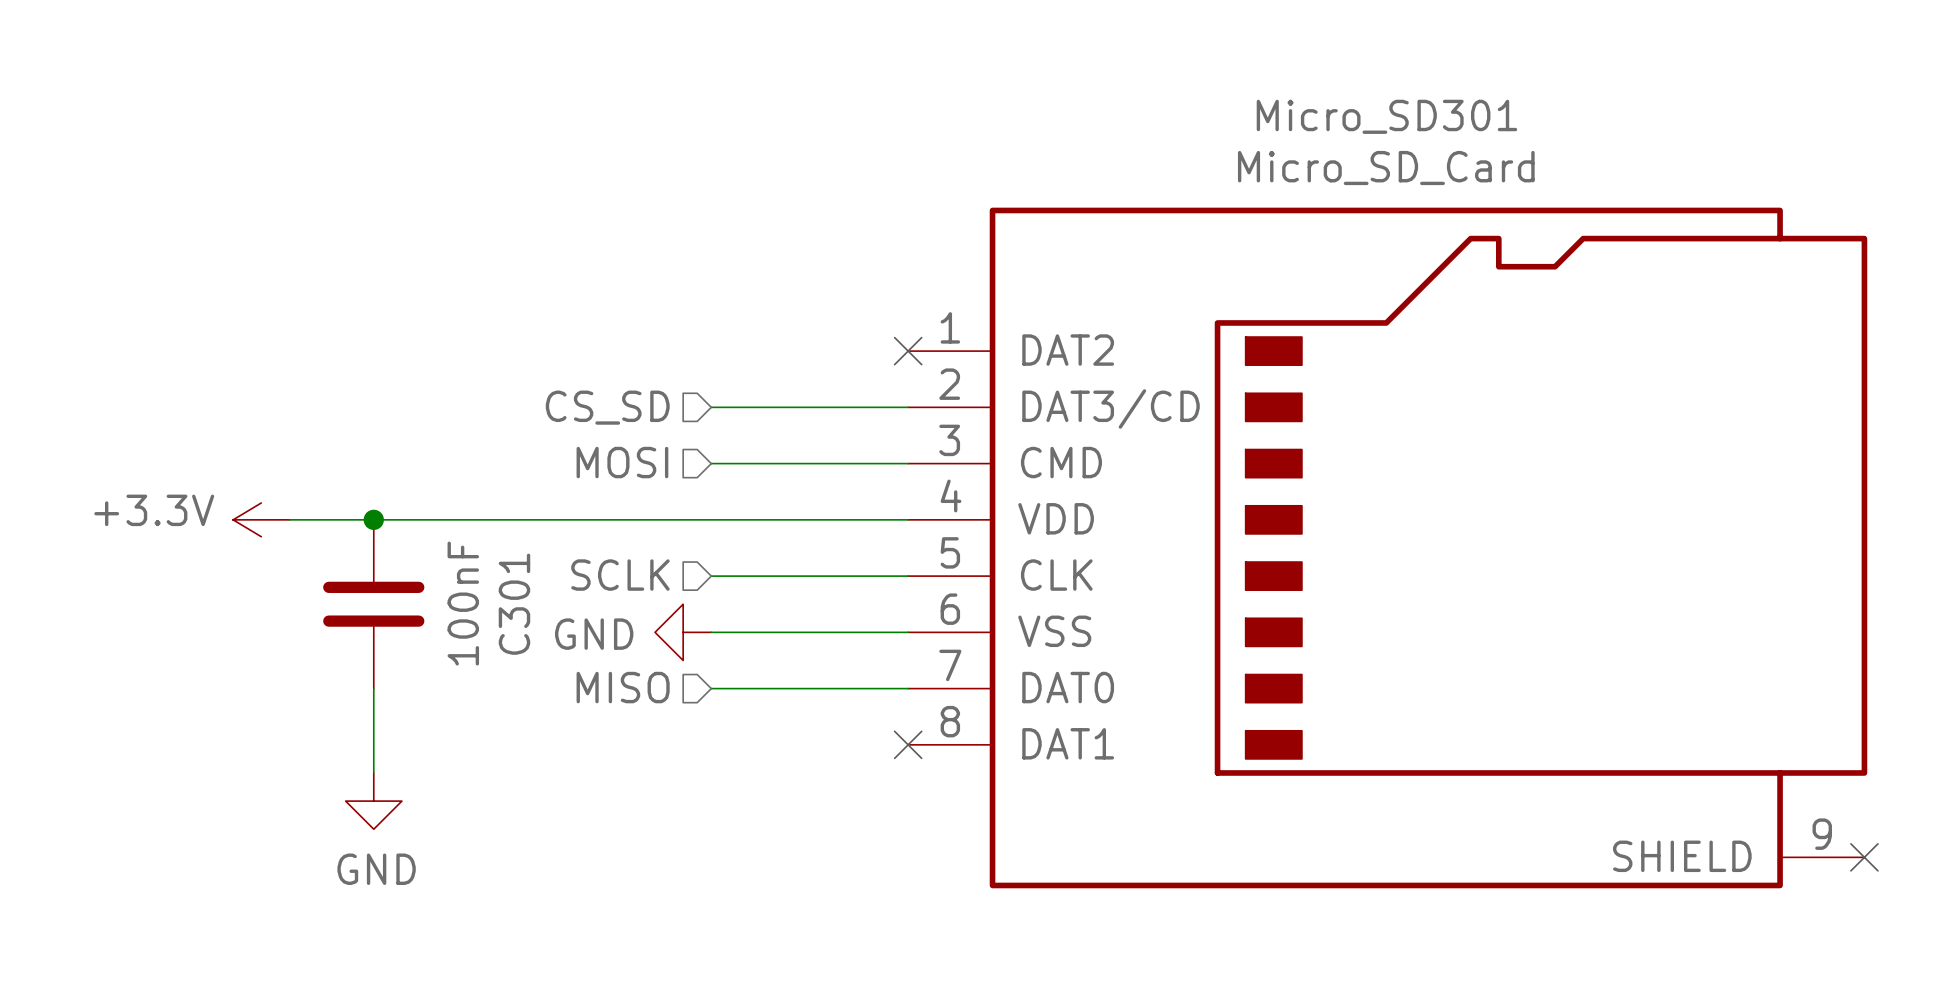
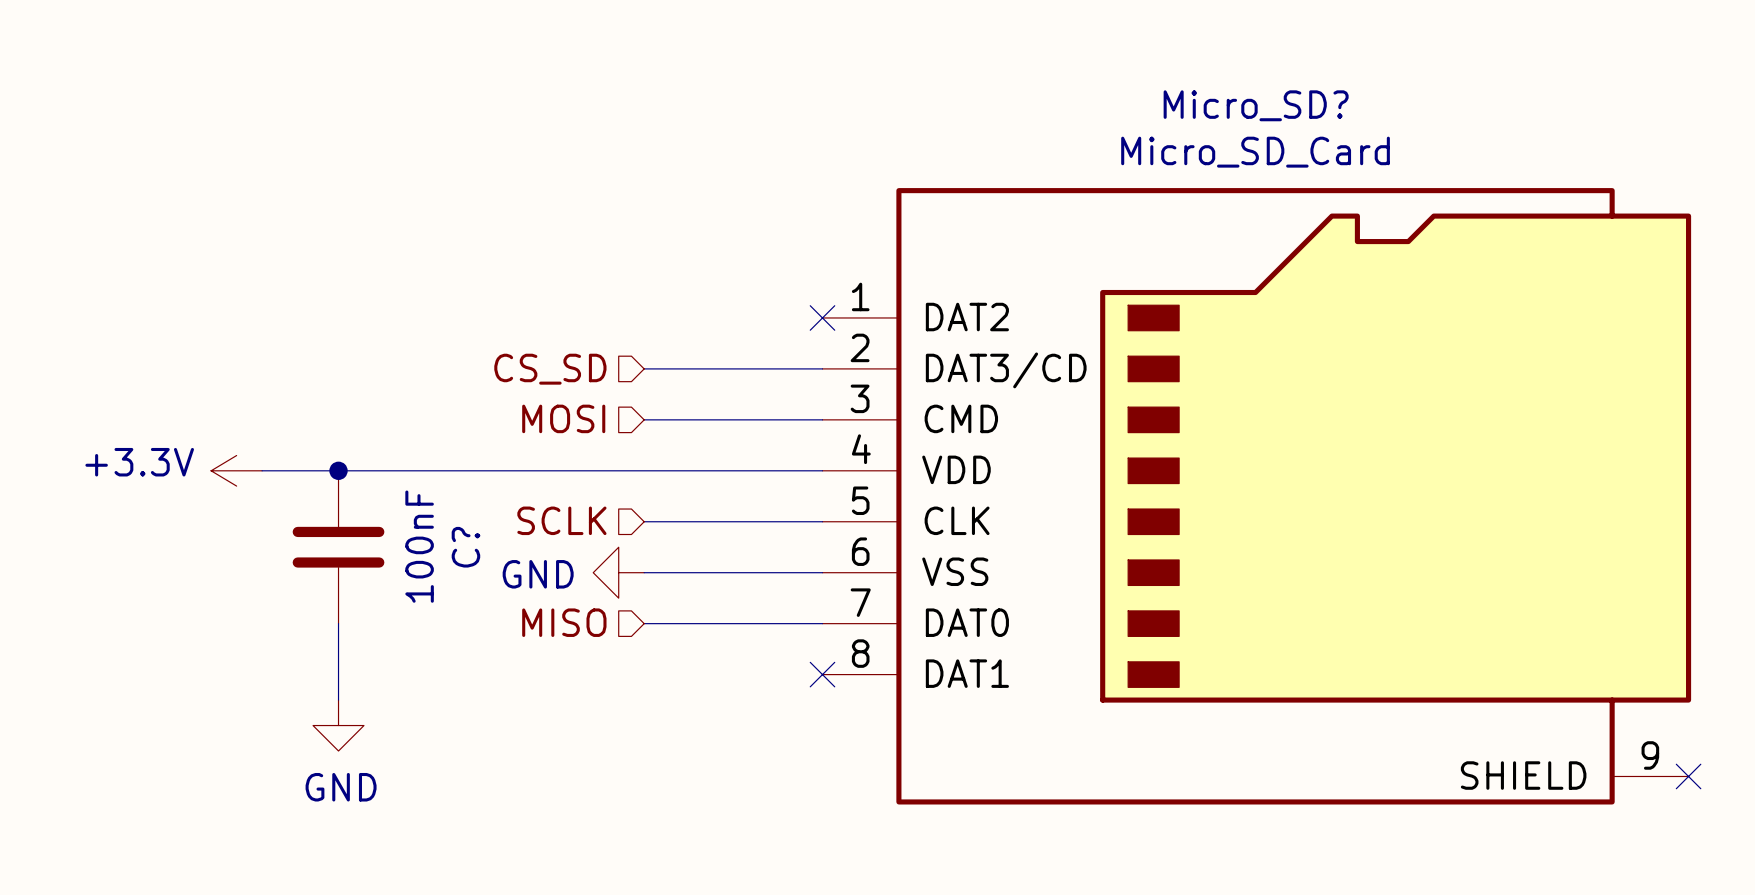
Micro_SD301 name: Micro_SD301 (1386, 116) -> Micro_SD? (1256, 105)
C301 name: C301 (514, 604) -> C? (465, 547)

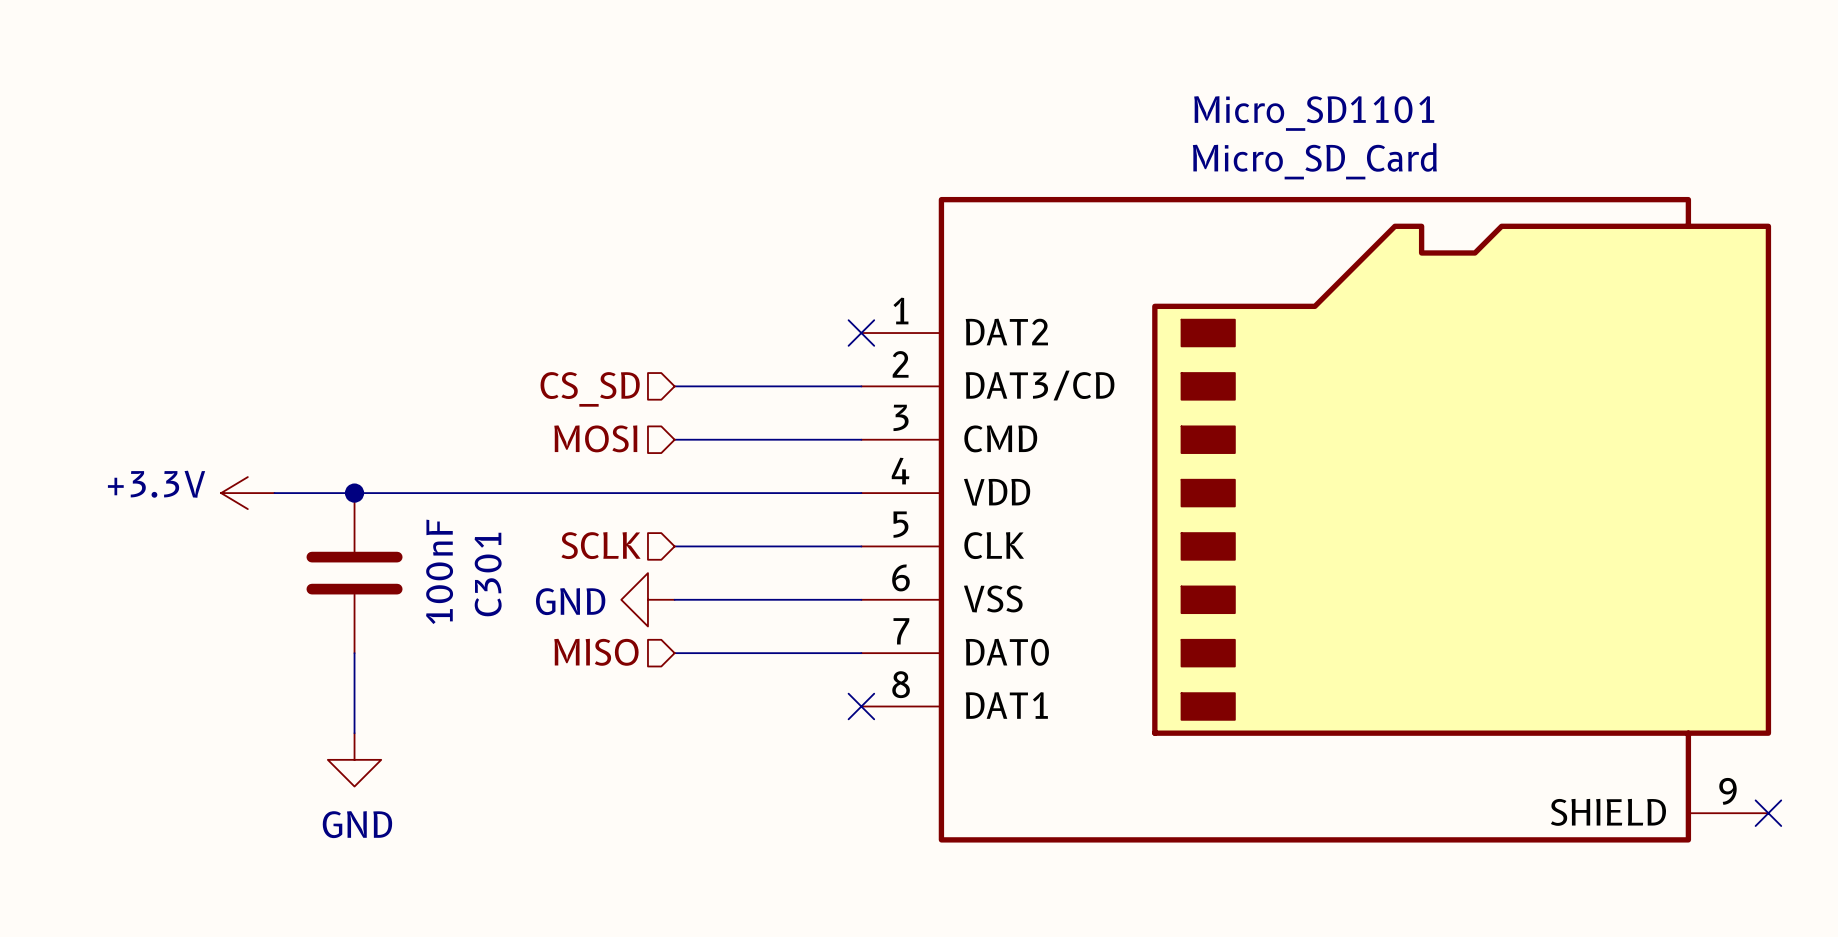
Micro_SD? name: Micro_SD? (1256, 105) -> Micro_SD1101 (1314, 113)
C? name: C? (465, 547) -> C301 (488, 574)

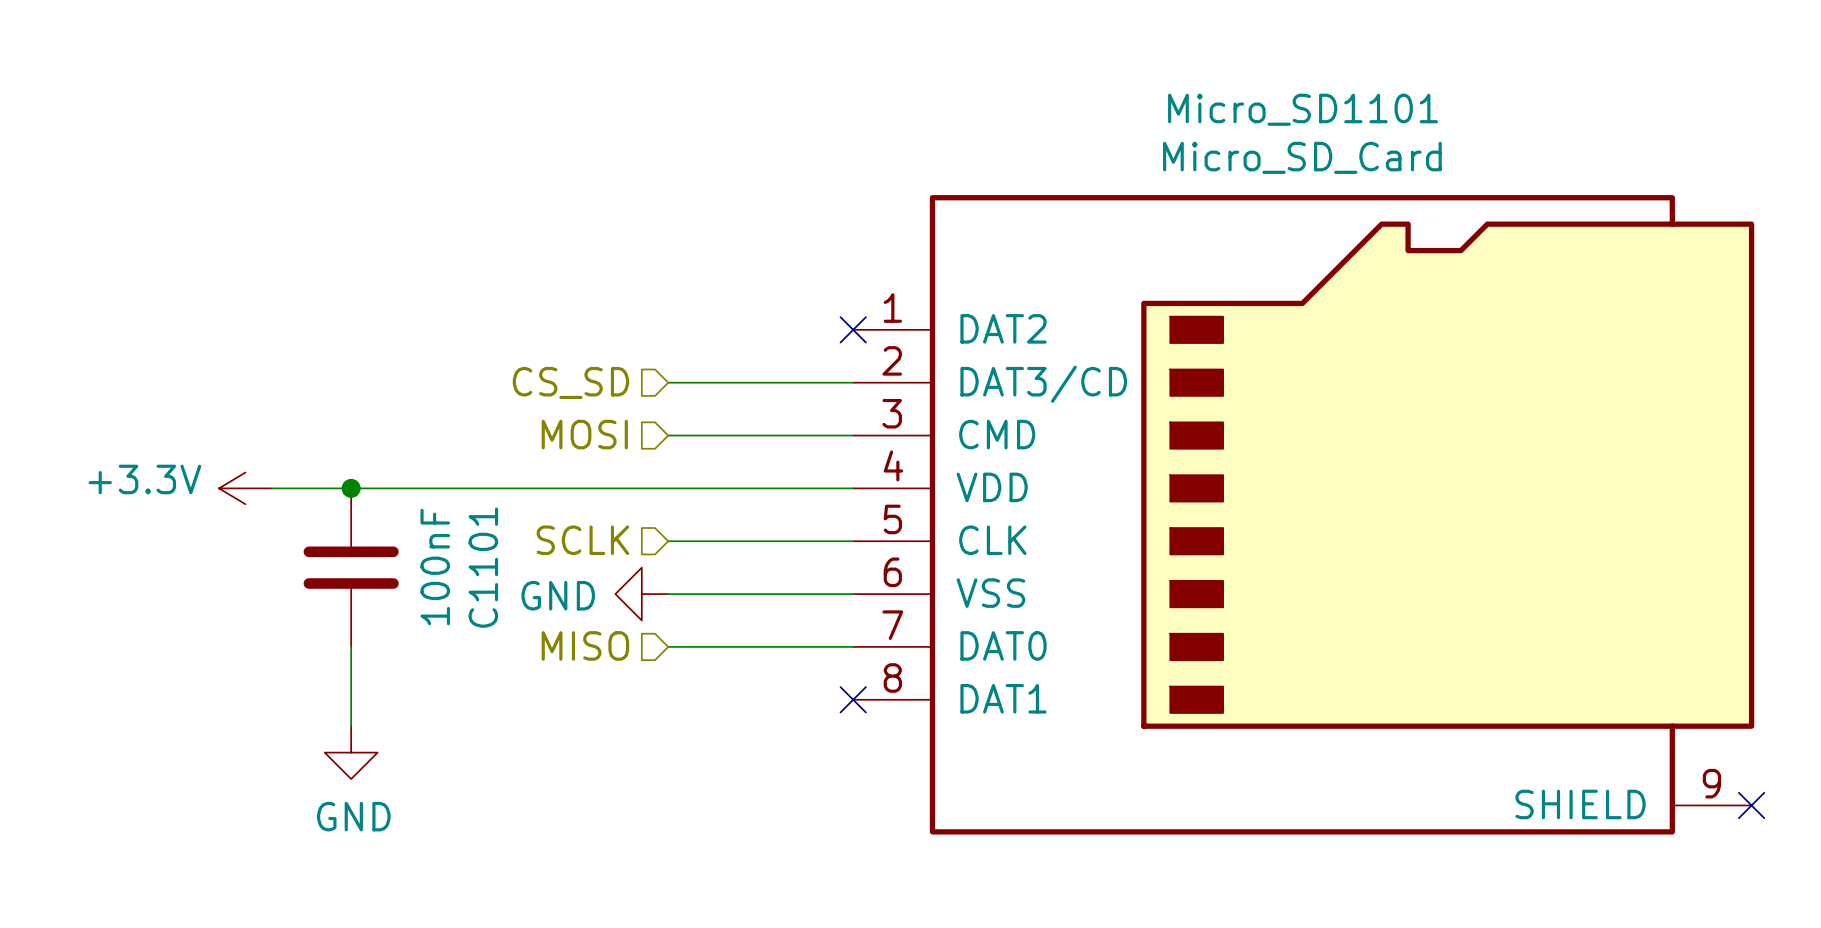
C301 name: C301 (488, 574) -> C1101 (483, 567)

